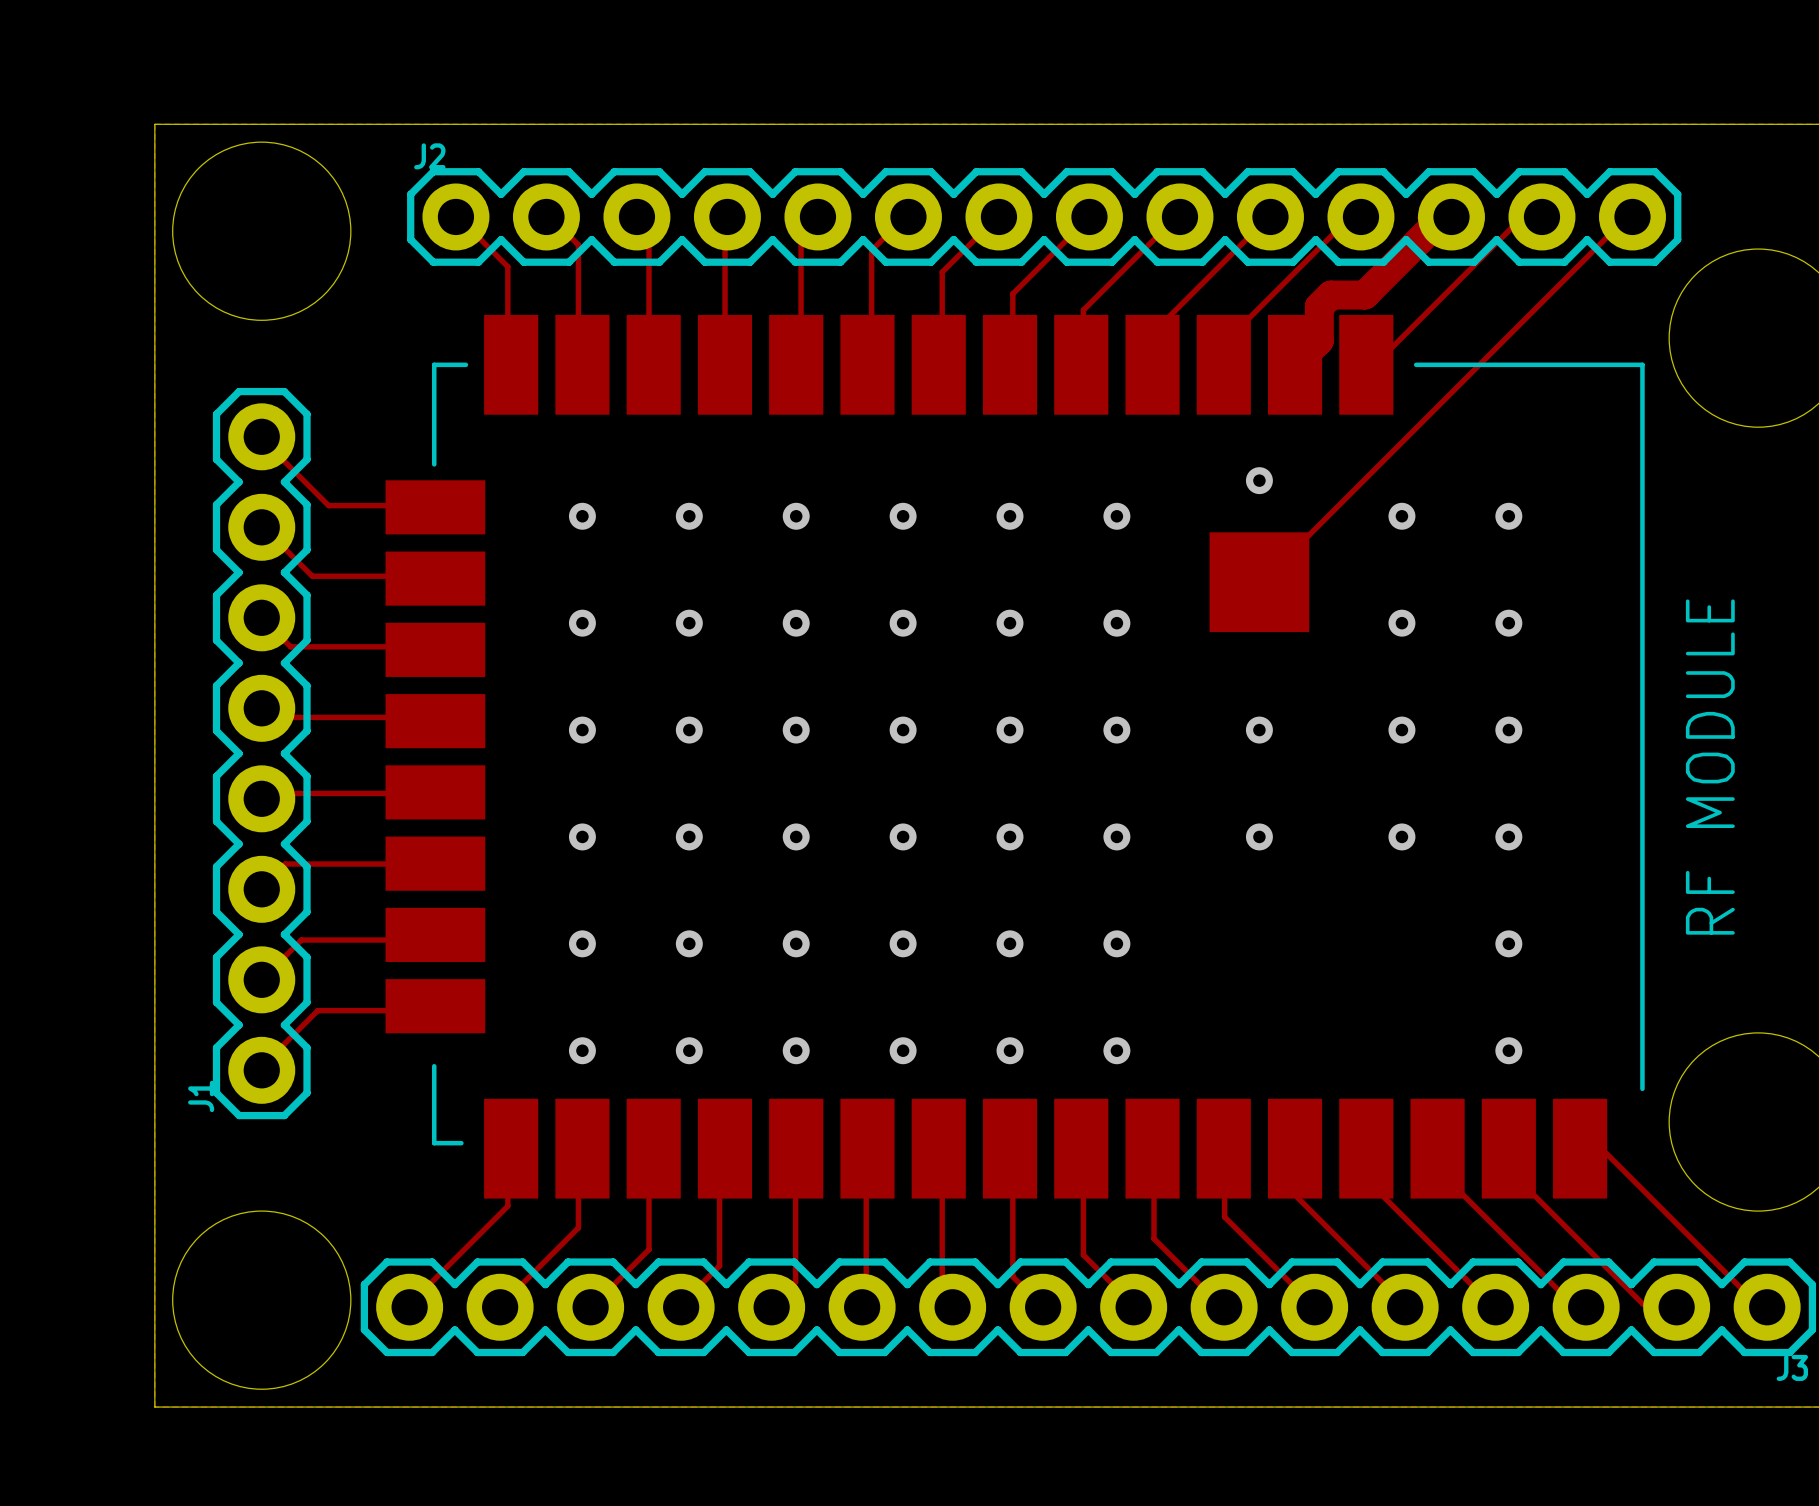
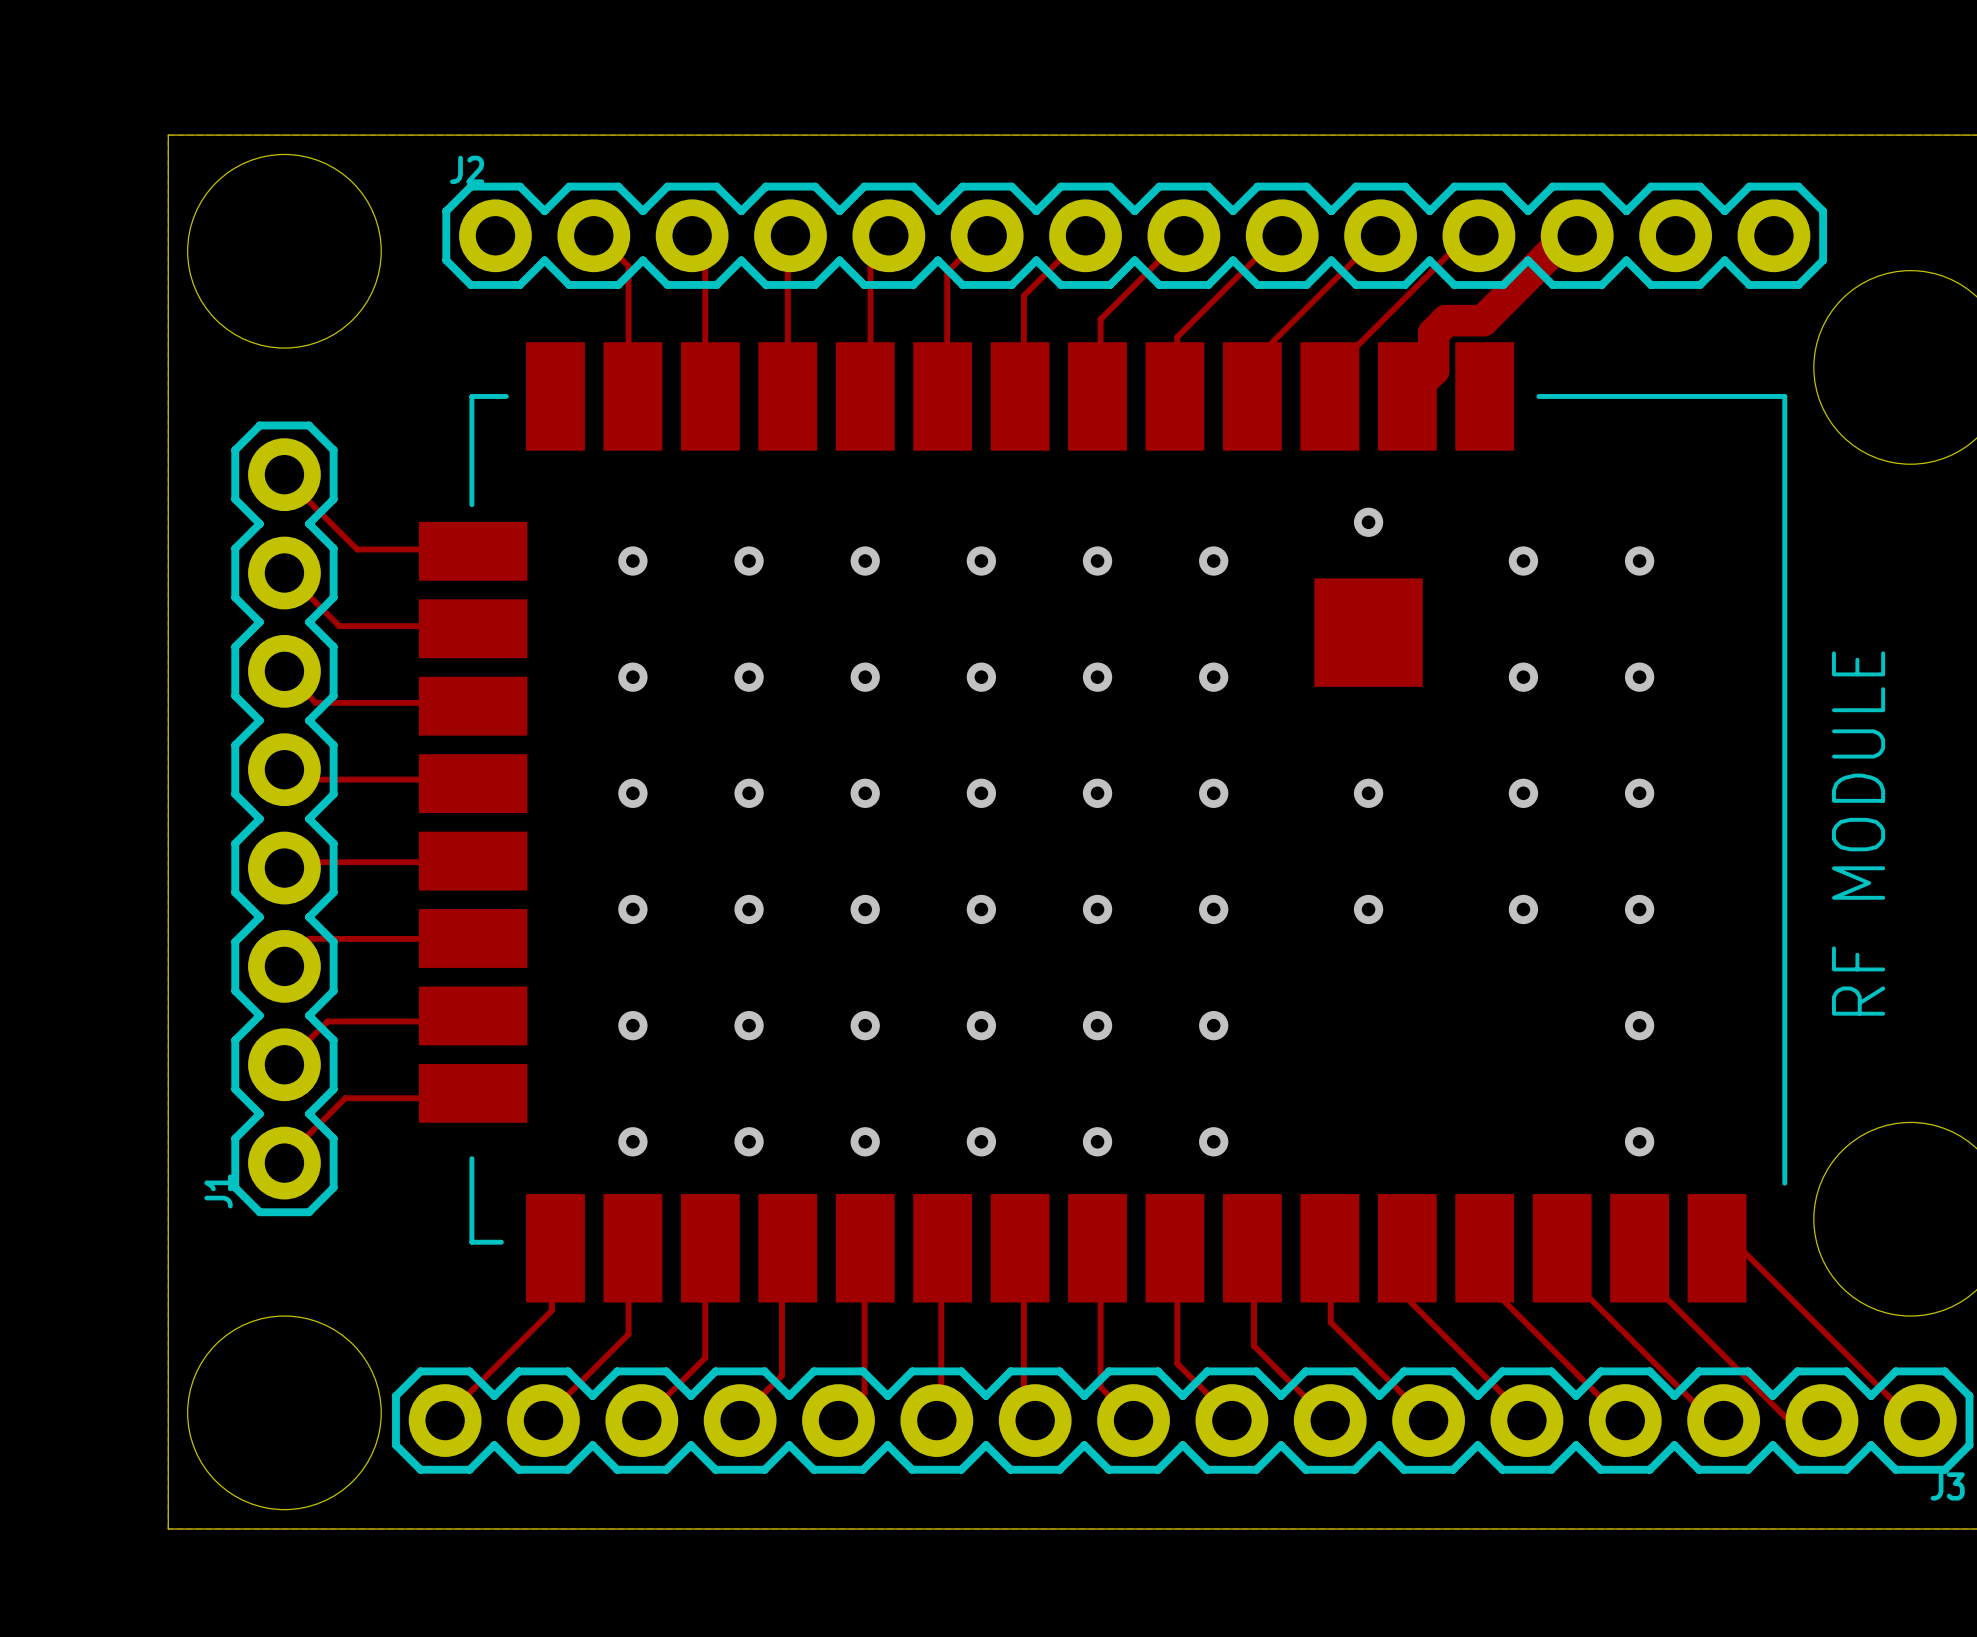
top track: (1631, 212) (1262, 581) -> none
top track: (1541, 216) (1511, 227) (1375, 364) -> none
top track: (458, 217) (507, 266) (507, 364) -> none

